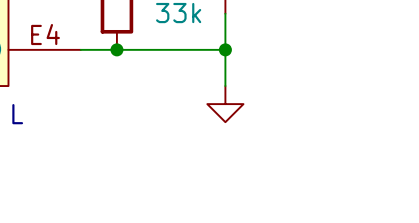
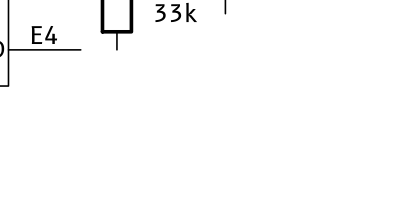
wire: (225, 13) (225, 86) -> none
wire: (80, 49) (225, 49) -> none
junction: (116, 49) -> none
junction: (225, 49) -> none
power symbol: (225, 104) -> none

